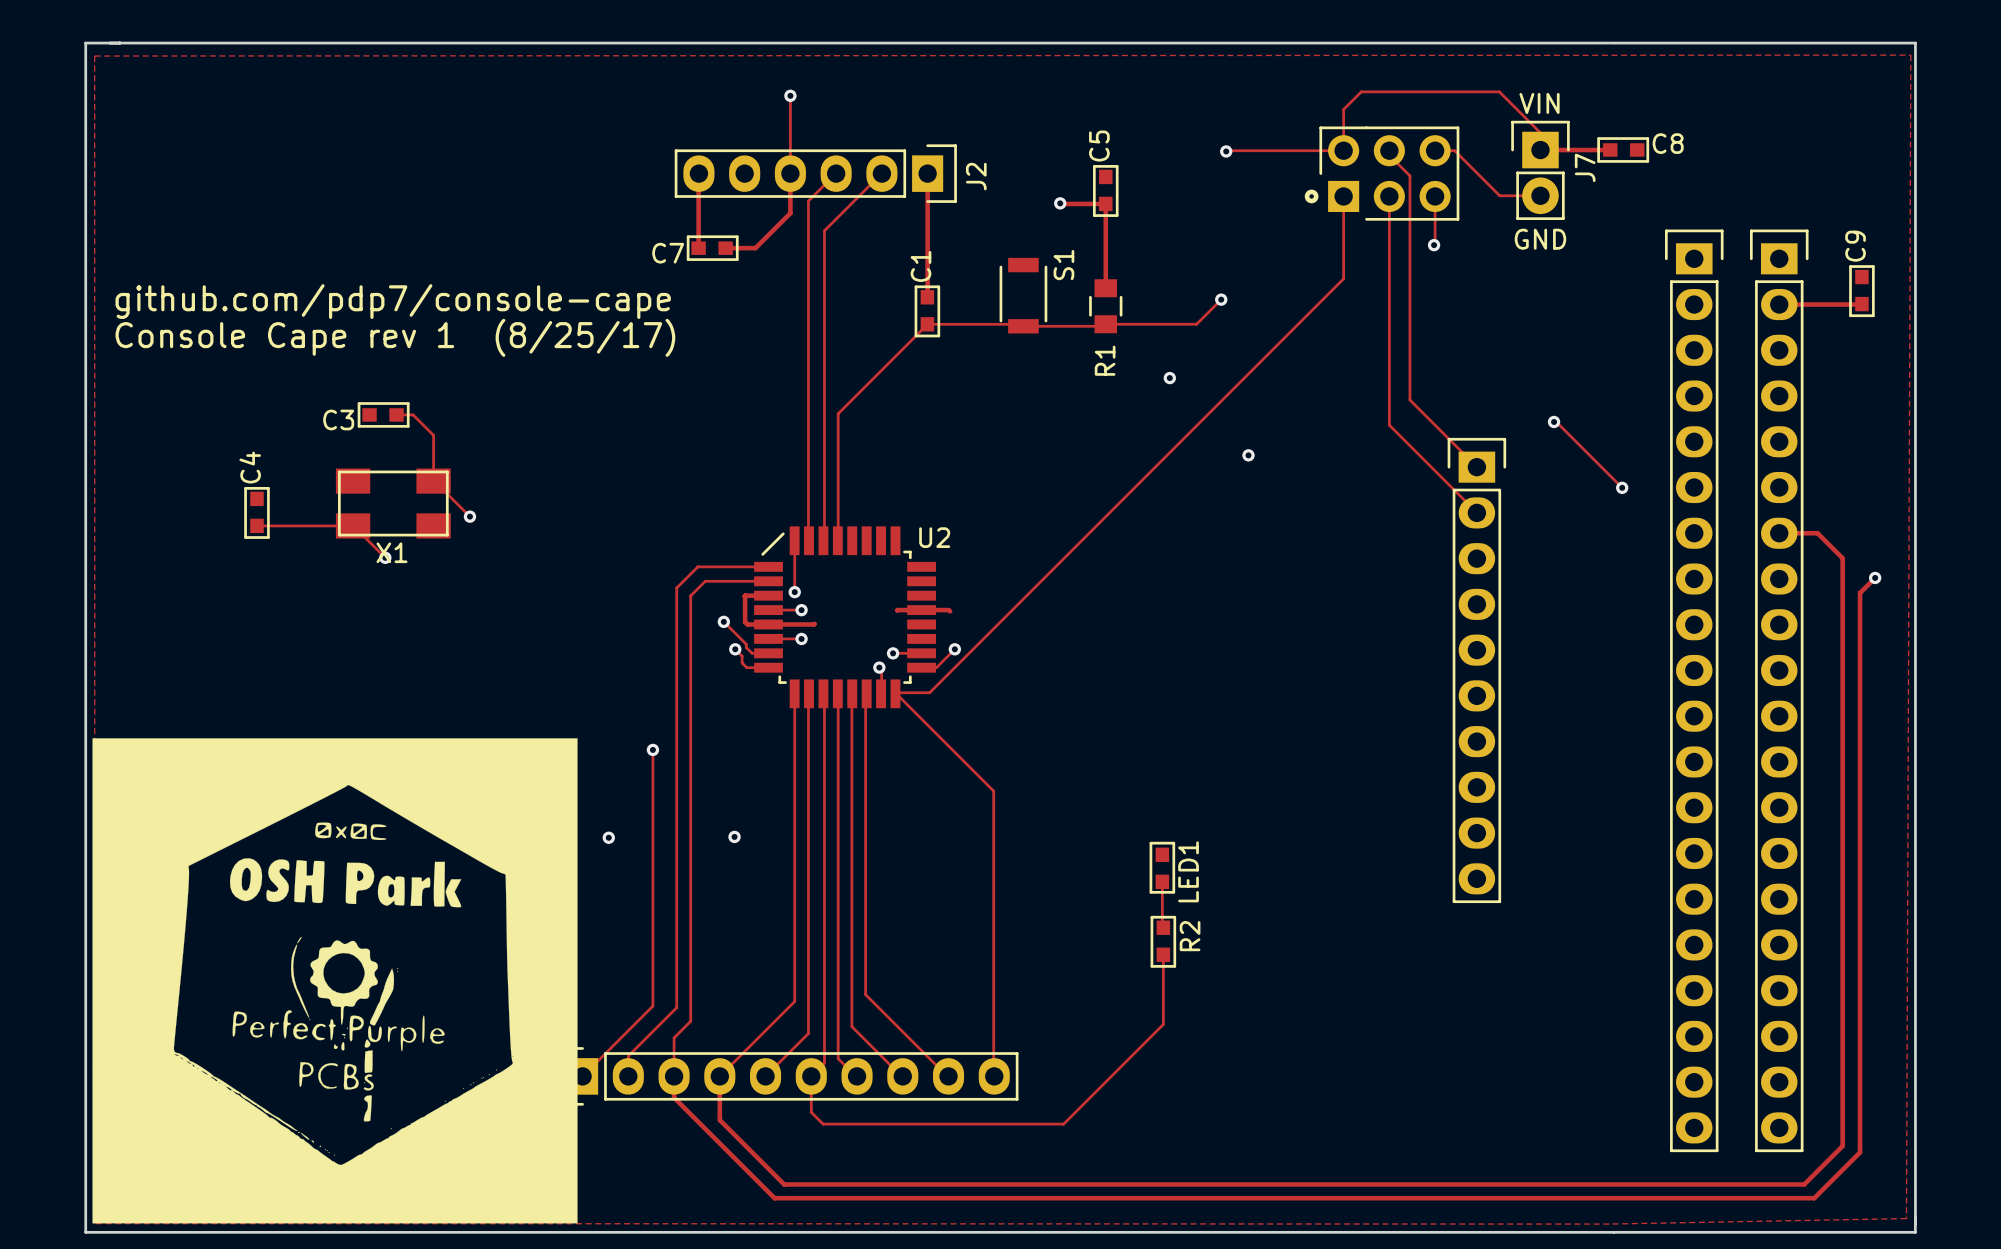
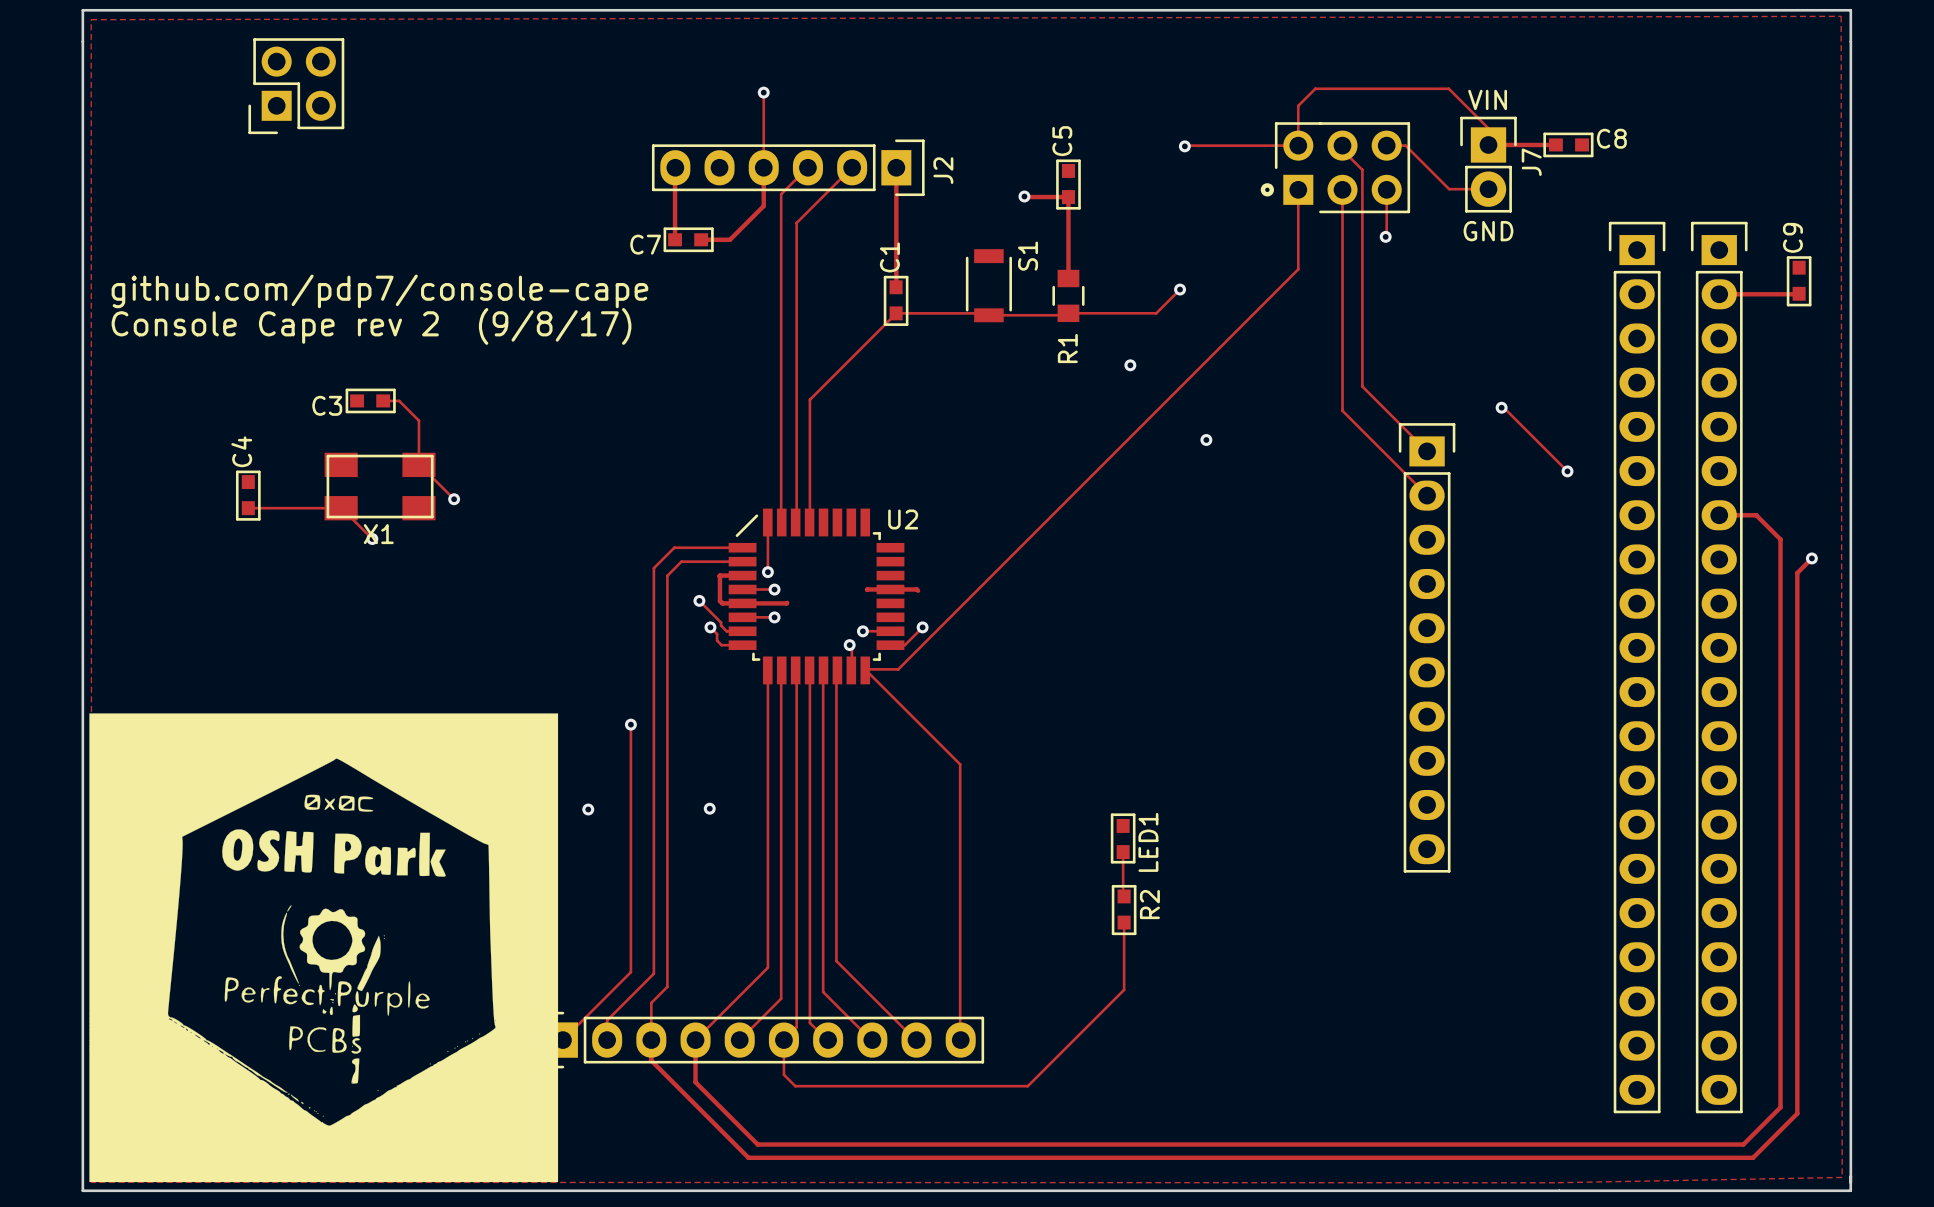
board edge: (85, 43) (1613, 43) -> (82, 41) (82, 10) (1850, 10) (1850, 41)
board edge: (1614, 43) (1915, 43) -> none
part: none -> (296, 86)
text: Console Cape rev 1 (8/25/17) (395, 337) -> Console Cape rev 2 (9/8/17) (371, 326)
zone outline: (1906, 1218) (1910, 55) (94, 56) (94, 1223) -> (1842, 1177) (1841, 16) (91, 19) (91, 1182)

